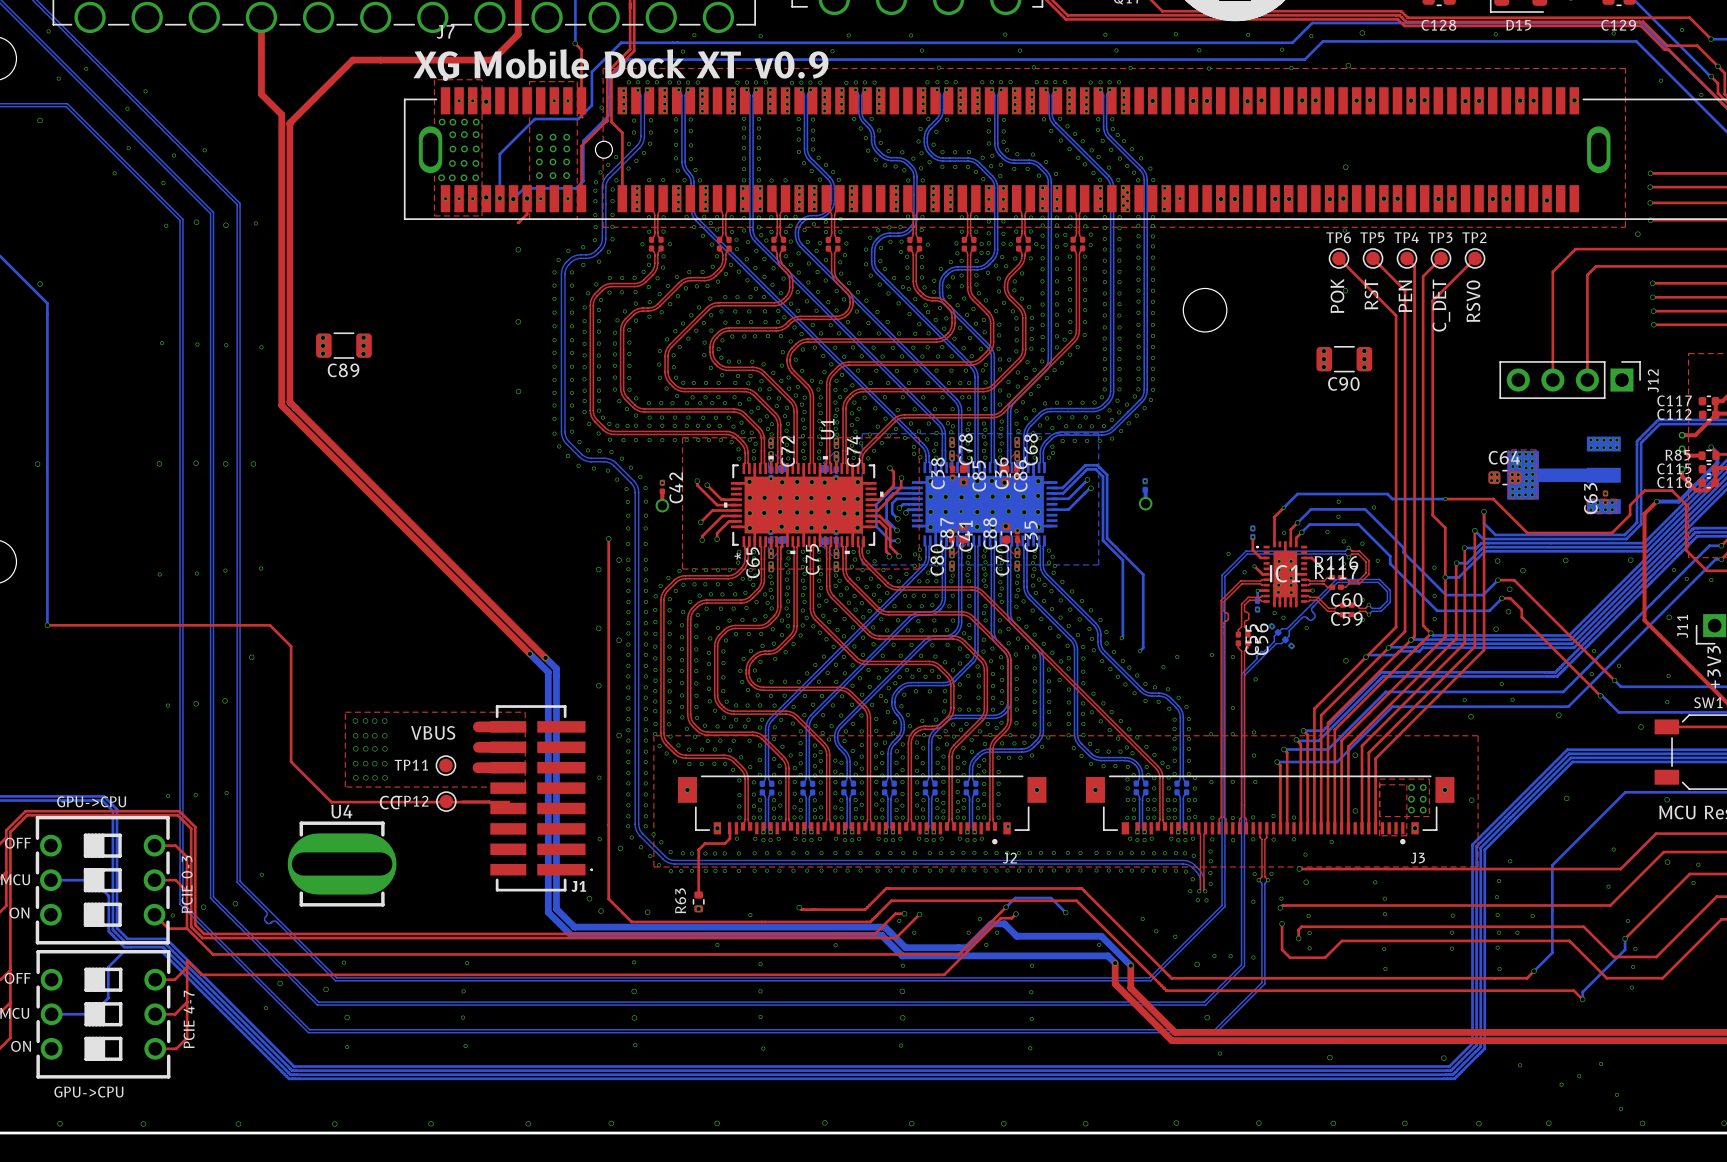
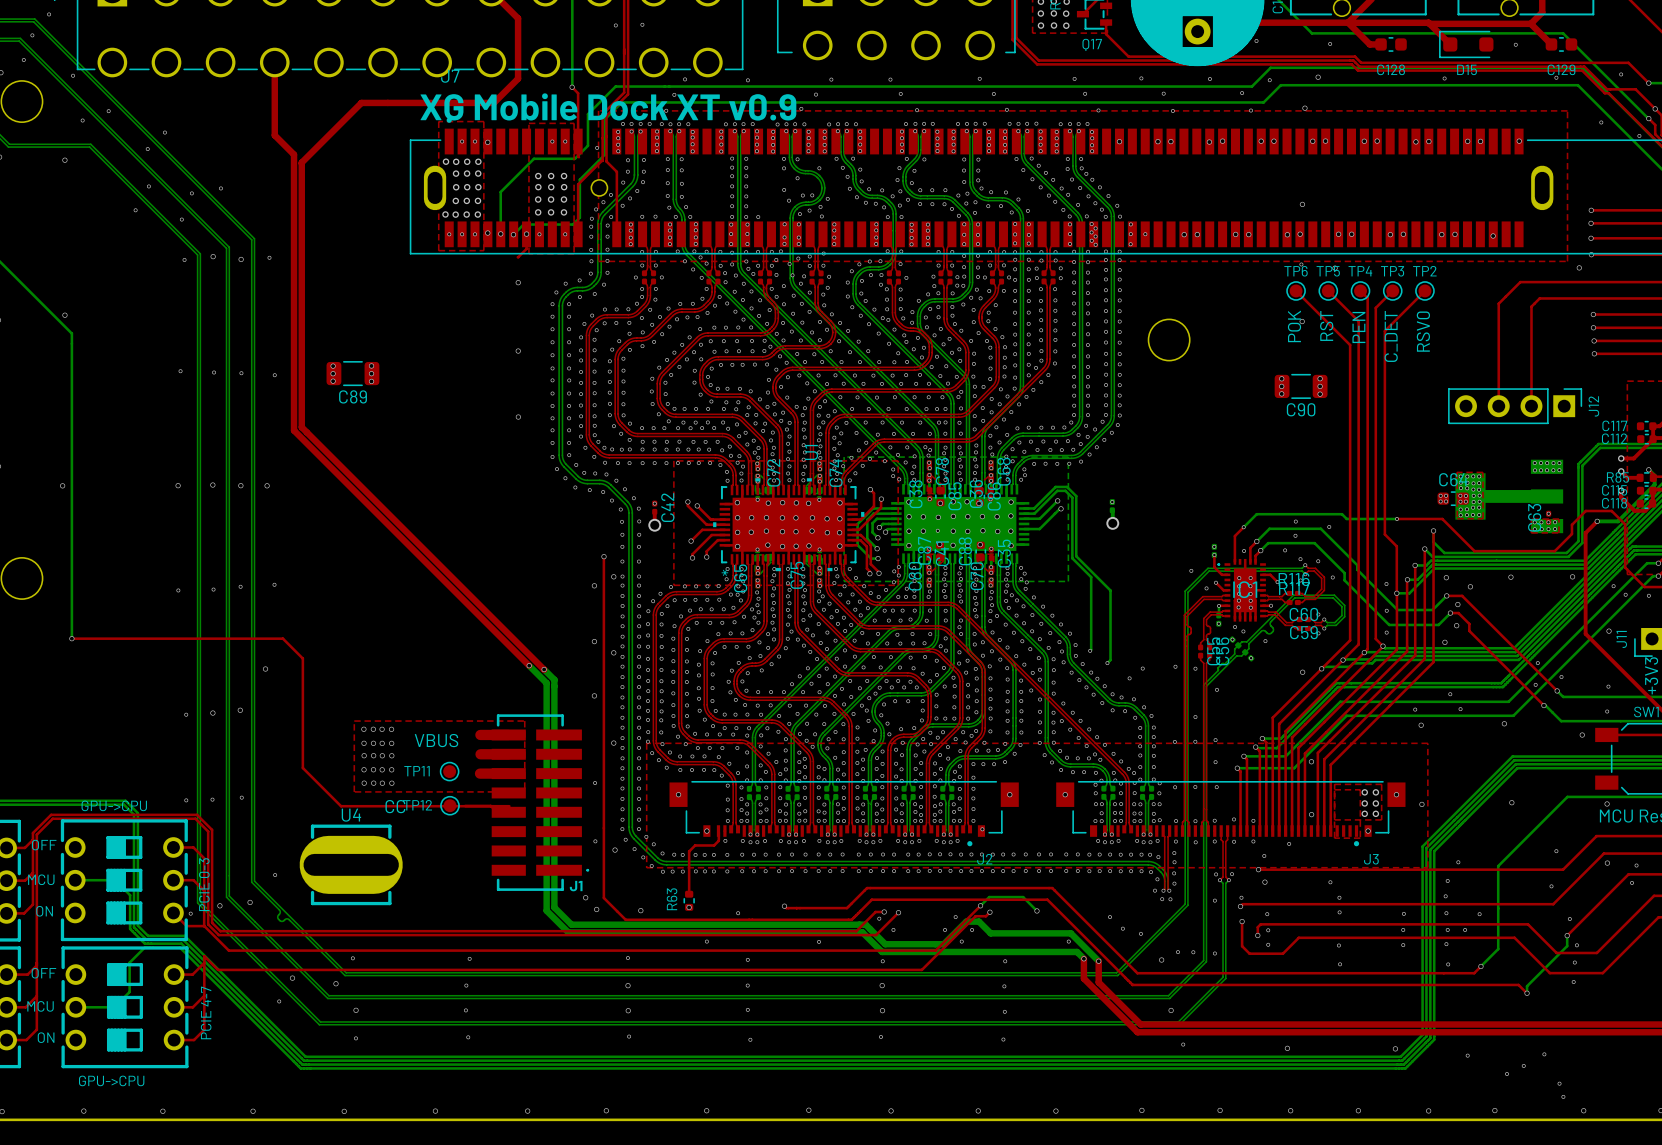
bottom track: (804, 117) (805, 153) (829, 182) (831, 200) (829, 206) (823, 213) (807, 216) (800, 220) -> (789, 157) (794, 169) (801, 173) (815, 175) (821, 186) (820, 193) (816, 199) (800, 203) (794, 206)
bottom track: (807, 117) (807, 152) (832, 180) (834, 200) (832, 208) (826, 215) (820, 218) (808, 219) (802, 222) -> (792, 157) (797, 167) (815, 172) (821, 177) (824, 185) (823, 194) (818, 201) (796, 208)
via: none -> (819, 168)
via: (813, 130) -> none
via: (798, 139) -> none
via: (813, 149) -> none
via: none -> (812, 195)
via: none -> (827, 198)
via: (826, 165) -> none
via: none -> (820, 206)
via: (811, 171) -> none
via: (833, 172) -> none
via: none -> (809, 210)
via: none -> (799, 214)
via: (820, 179) -> none
via: (785, 180) -> none
via: (799, 194) -> none
via: (814, 194) -> none
bottom track: (800, 220) (796, 228) (796, 239) (810, 256) -> (794, 206) (790, 218) (790, 278) (794, 289)
bottom track: (802, 222) (798, 229) (799, 239) (812, 254) -> (796, 208) (793, 218) (793, 279) (796, 287)

